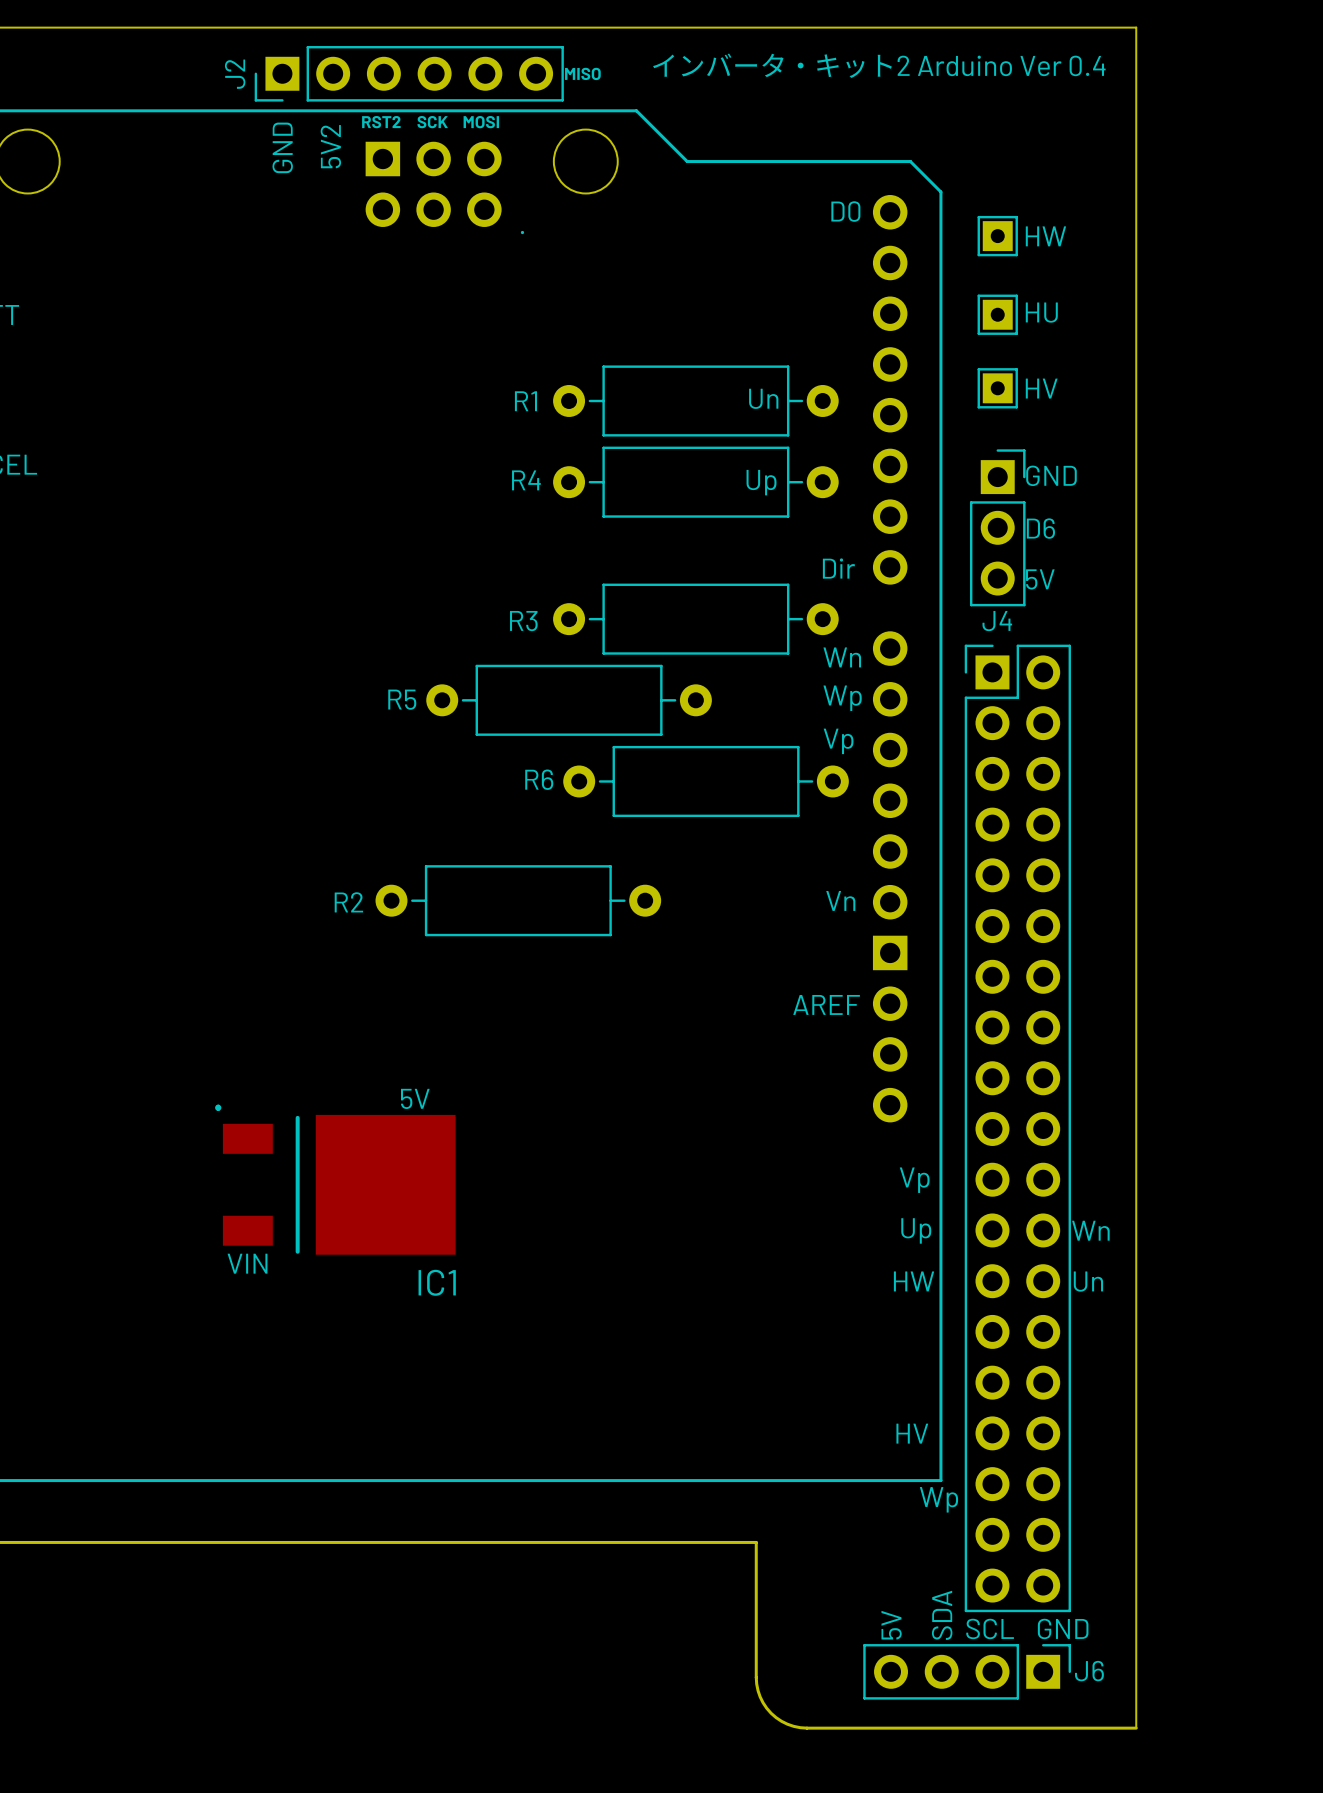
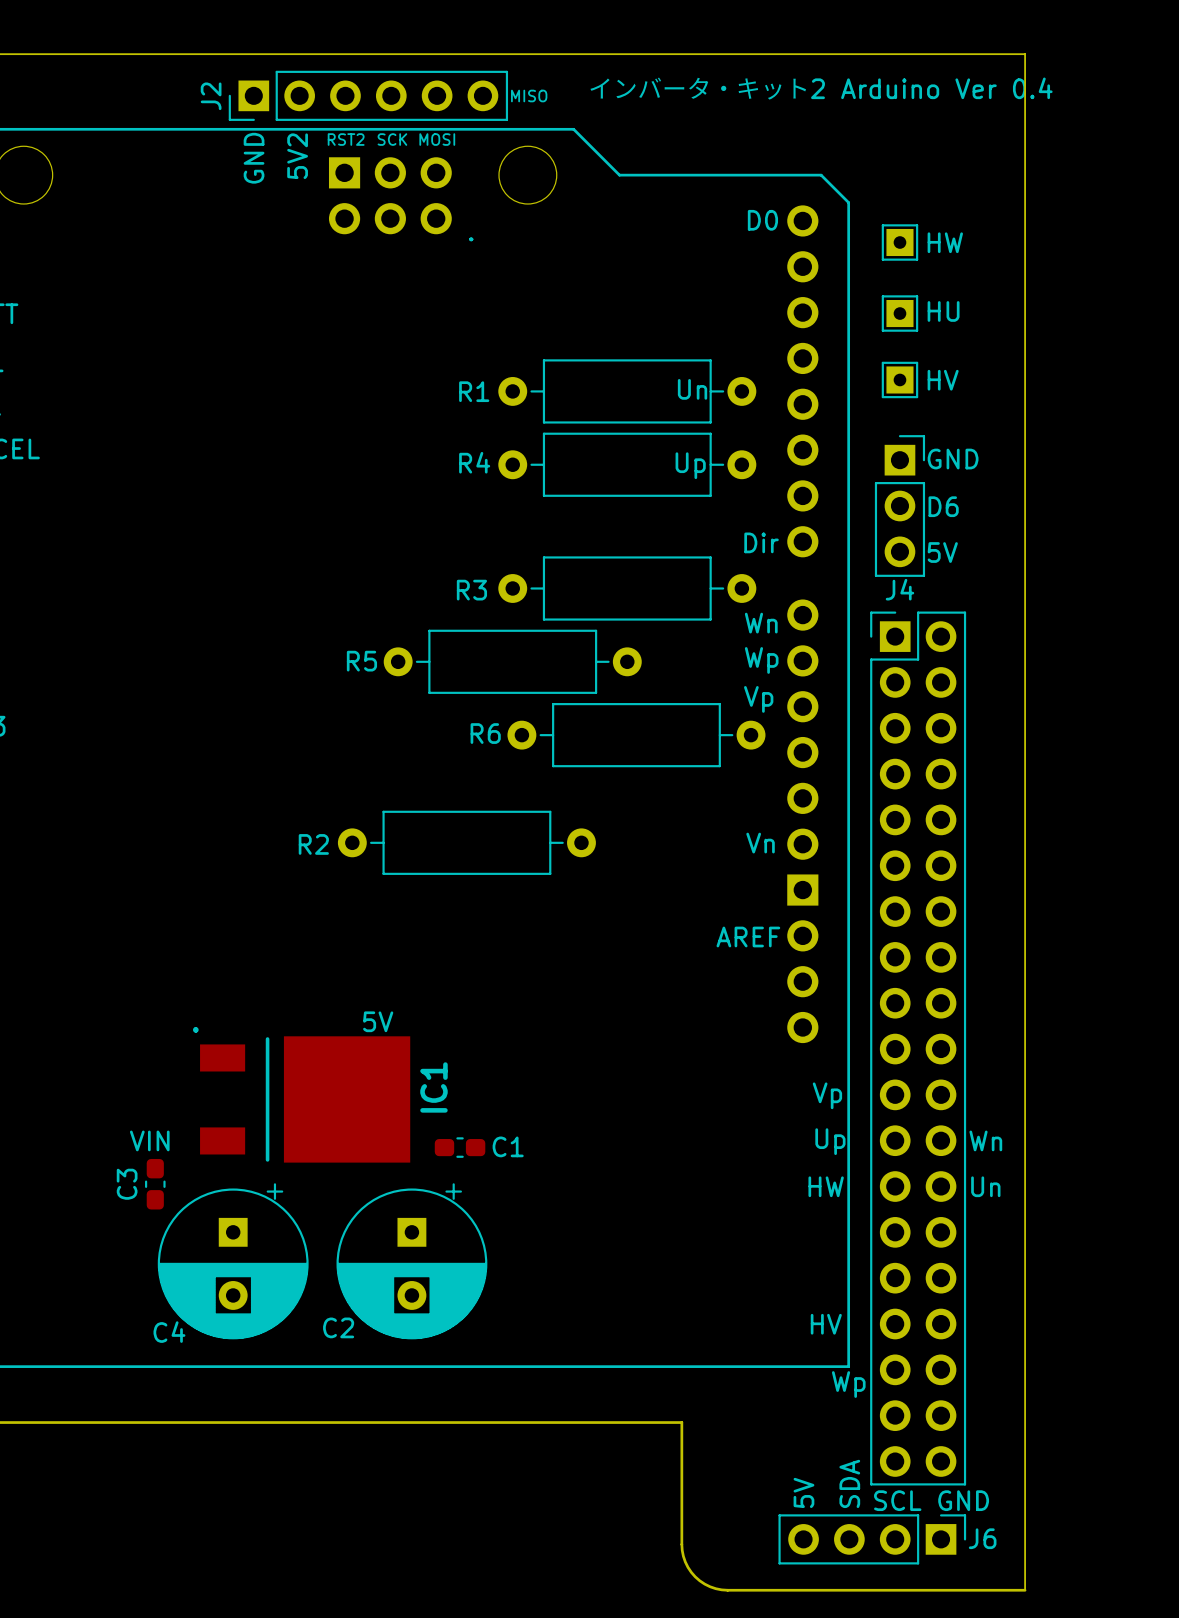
C1: none -> (460, 1147)
text position: VIN (247, 1263) -> VIN (149, 1140)
C3: none -> (155, 1184)
IC1 name rotation: 0° (437, 1282) -> 90° counterclockwise (433, 1087)
IC1 name position: IC1 (437, 1282) -> IC1 (433, 1087)
C4: none -> (233, 1261)
C2: none -> (411, 1261)

